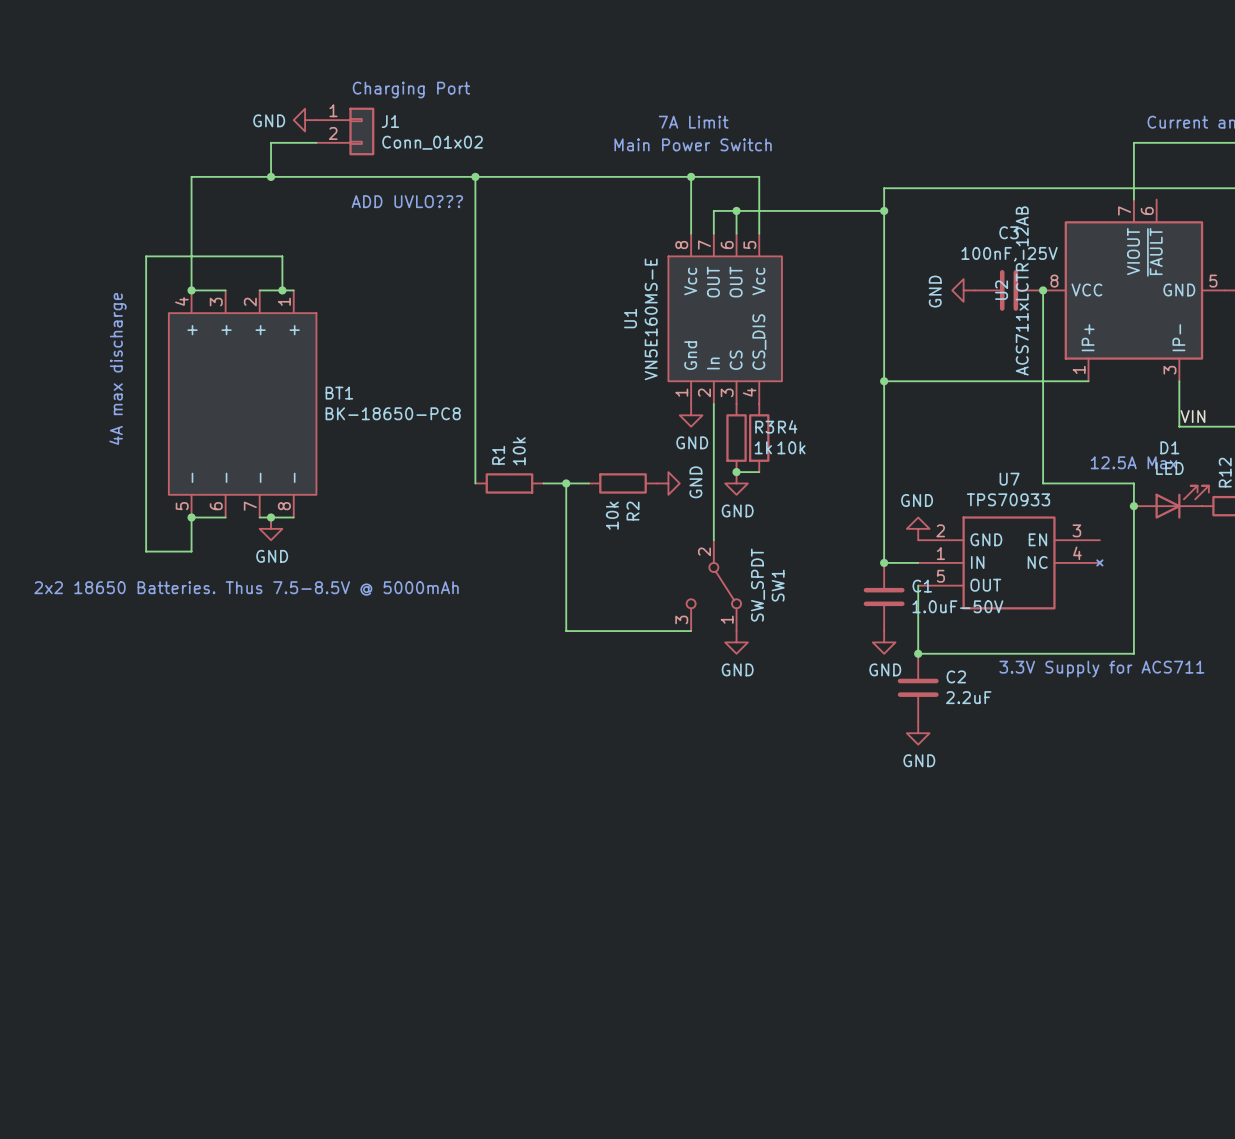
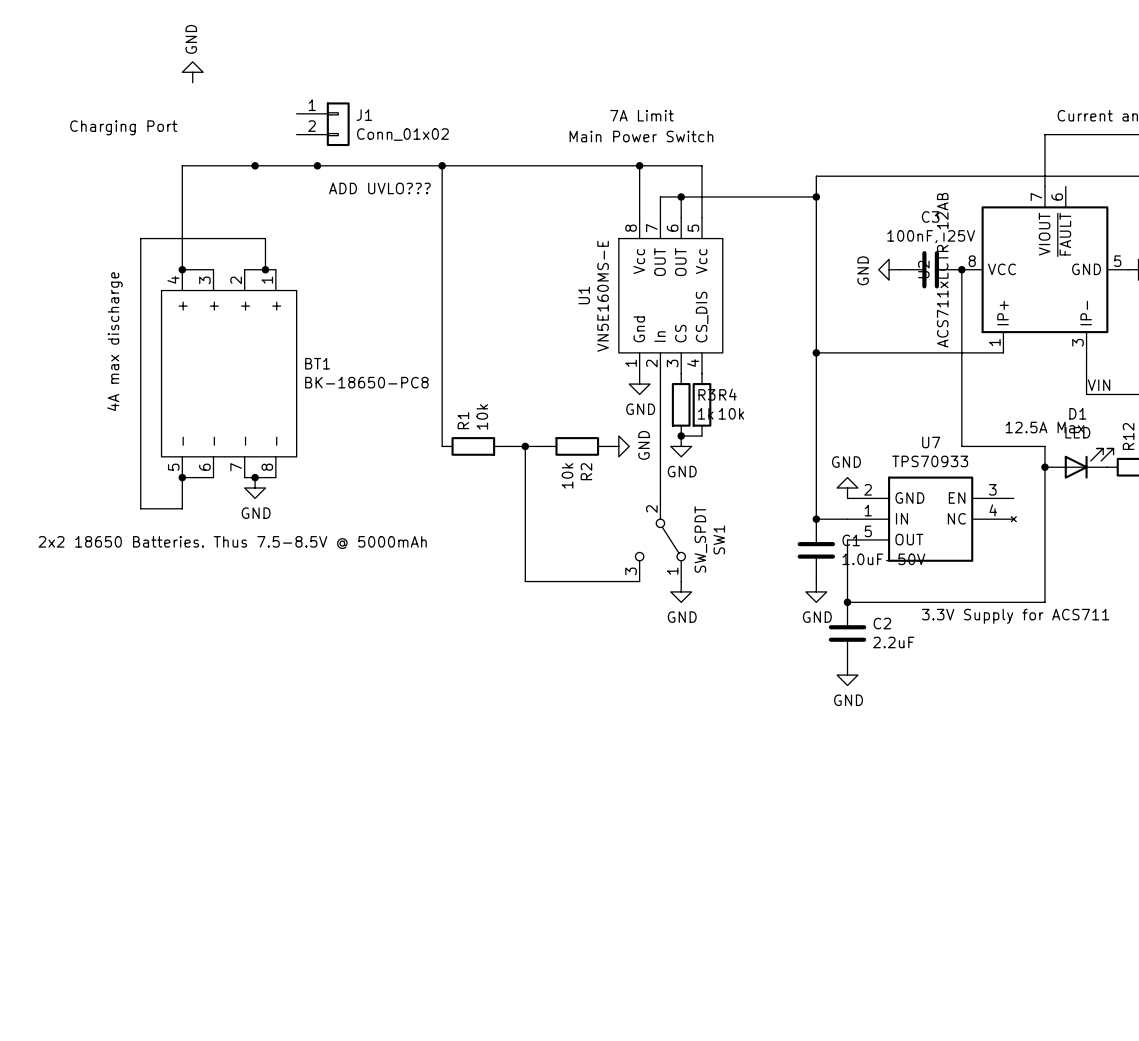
text: Charging Port (411, 90) -> none
power symbol rotation: 0° (305, 120) -> 90° clockwise (192, 72)
power symbol position: GND (305, 120) -> GND (192, 72)
text: none -> Charging Port (123, 127)
wire: (316, 142) (271, 142) (271, 176) -> none
junction: none -> (317, 165)

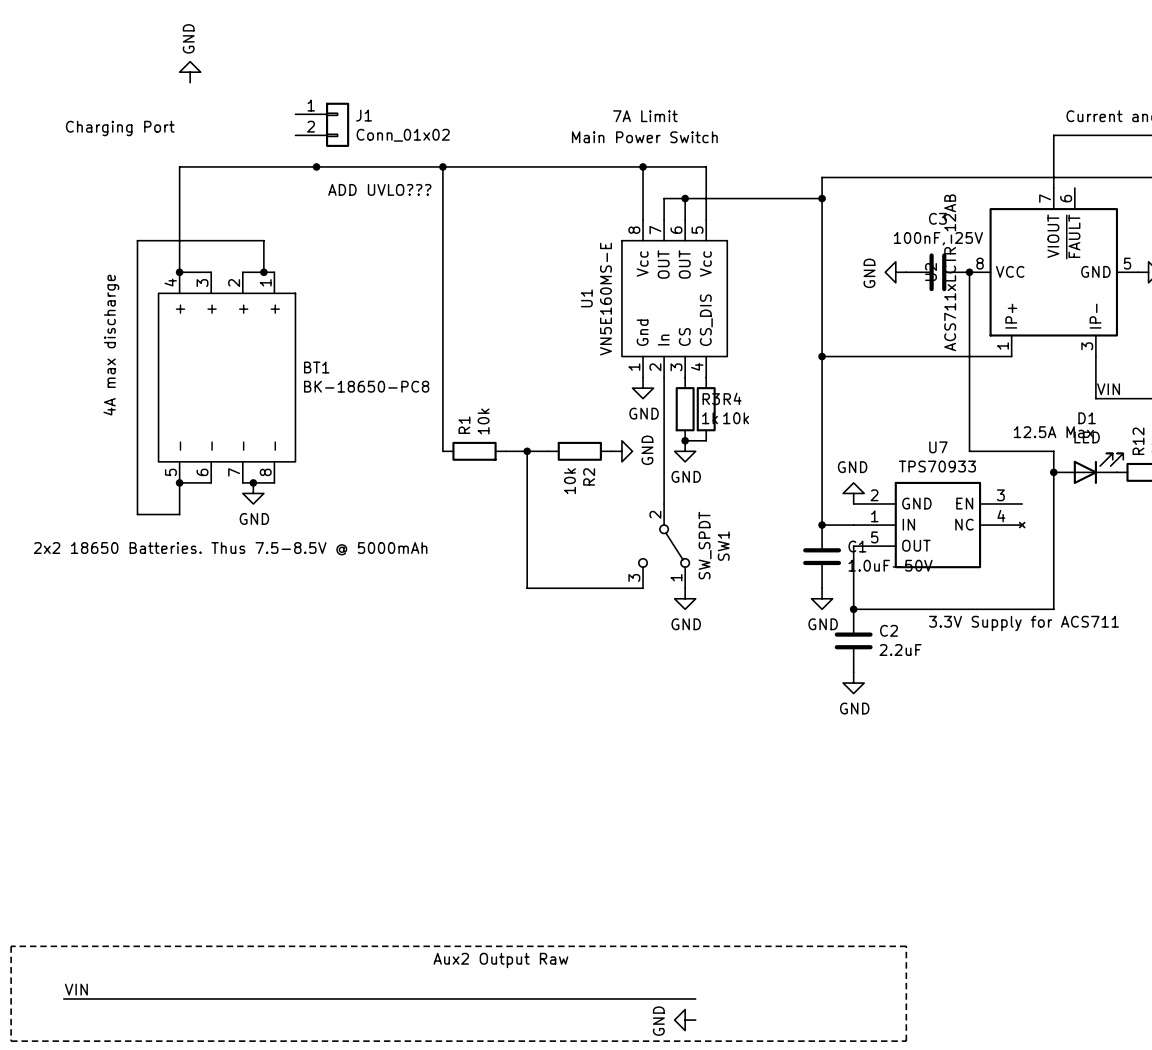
junction: (255, 165) -> none
line: none -> (11, 946) (11, 1041) (906, 1041) (906, 946) (11, 946)
text: none -> Aux2 Output Raw (500, 960)
label: none -> VIN (76, 989)
wire: none -> (63, 999) (695, 999)
power symbol: none -> GND (685, 1020)

